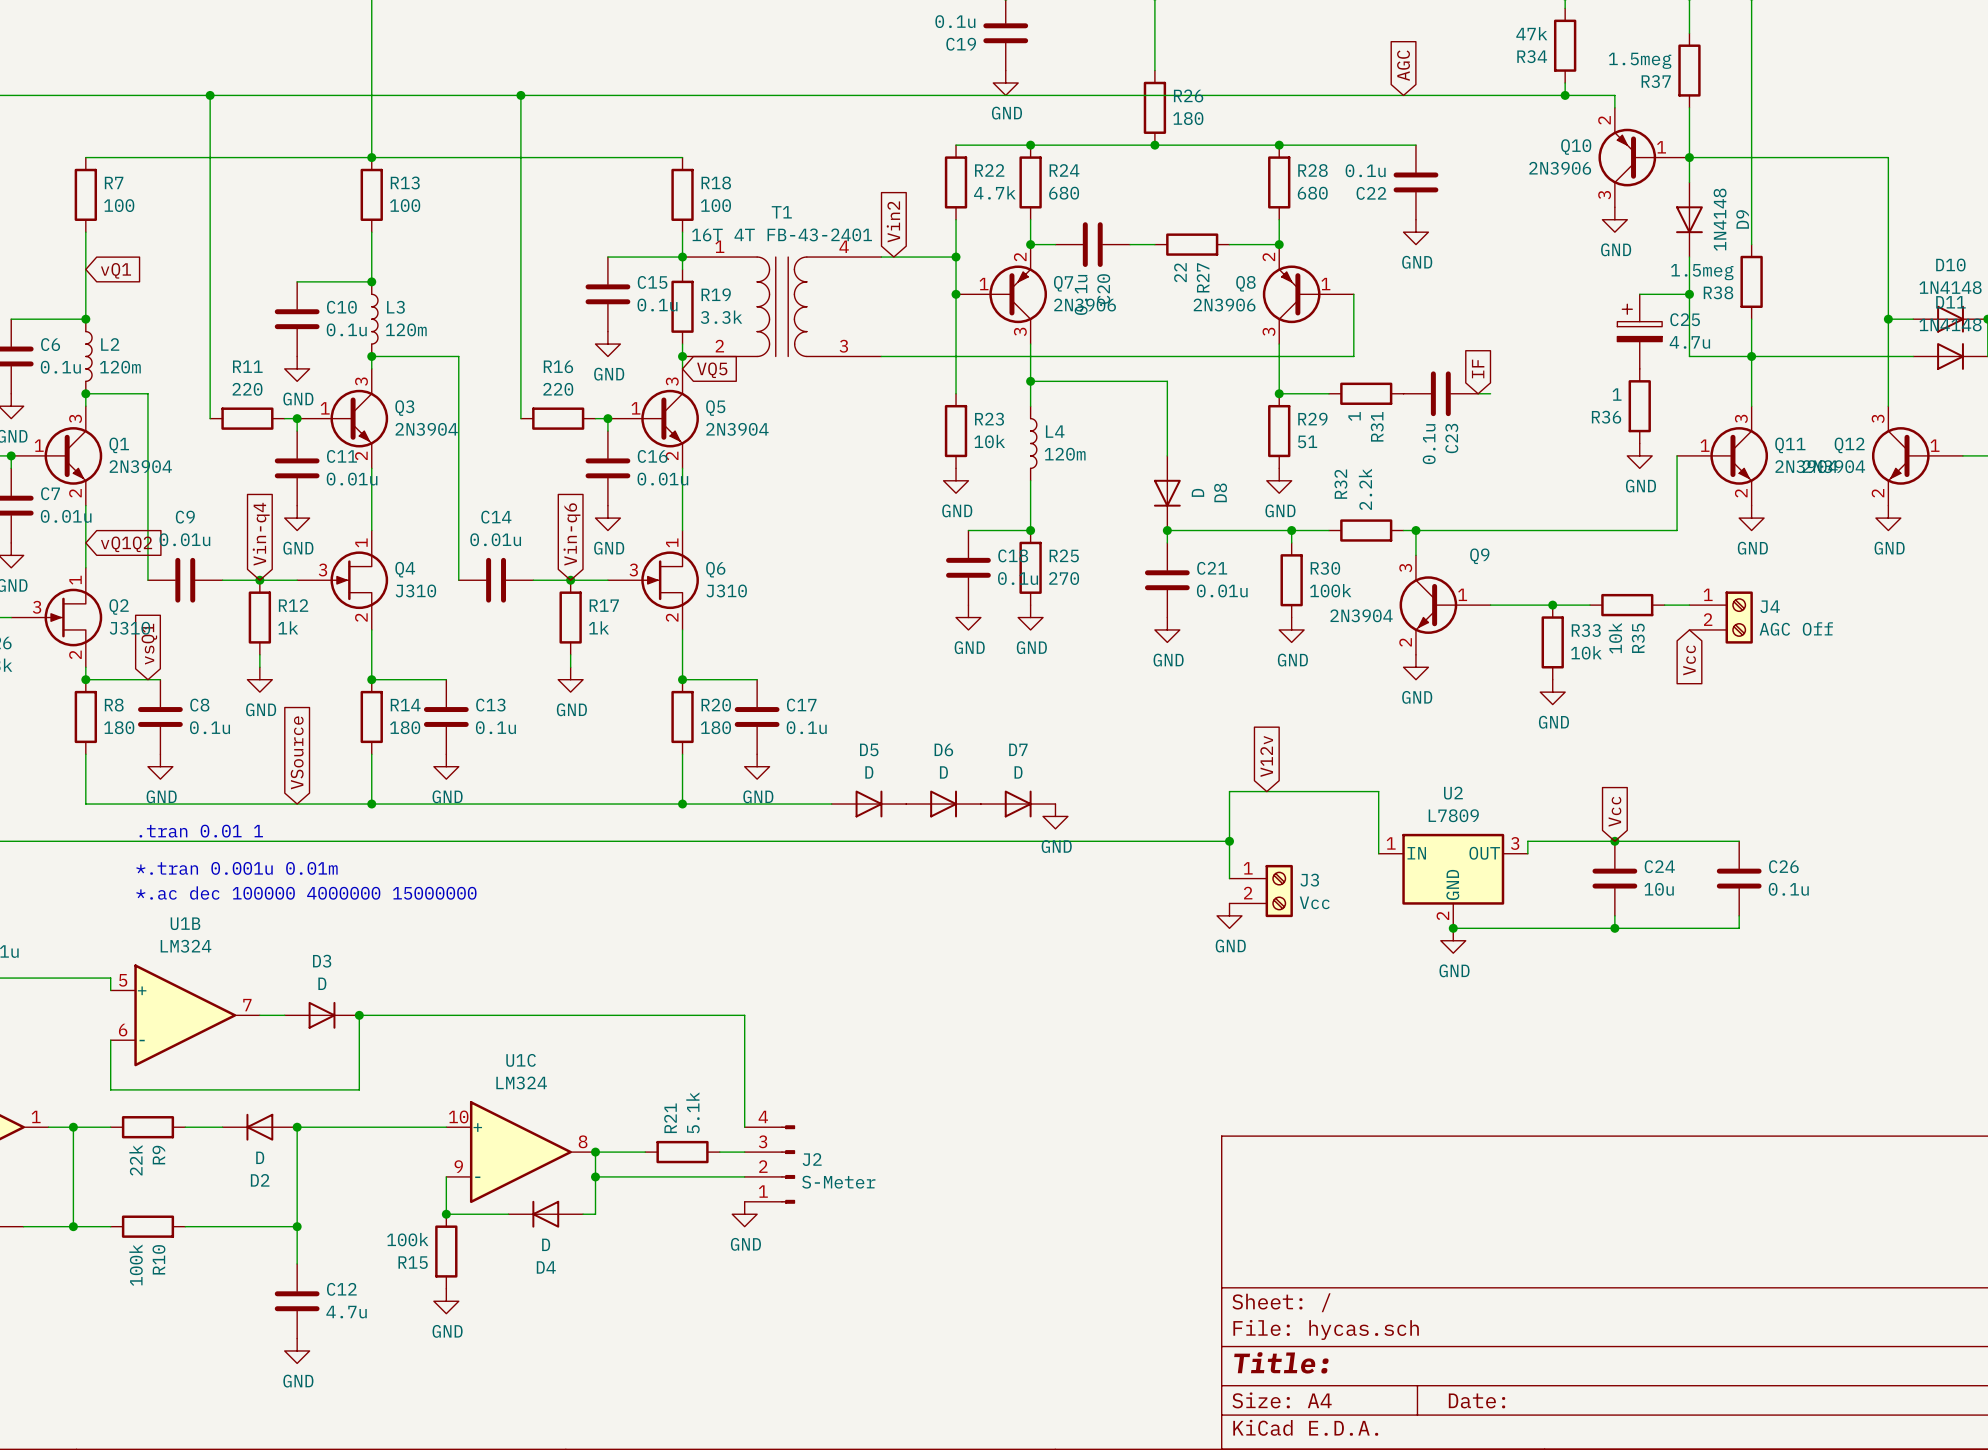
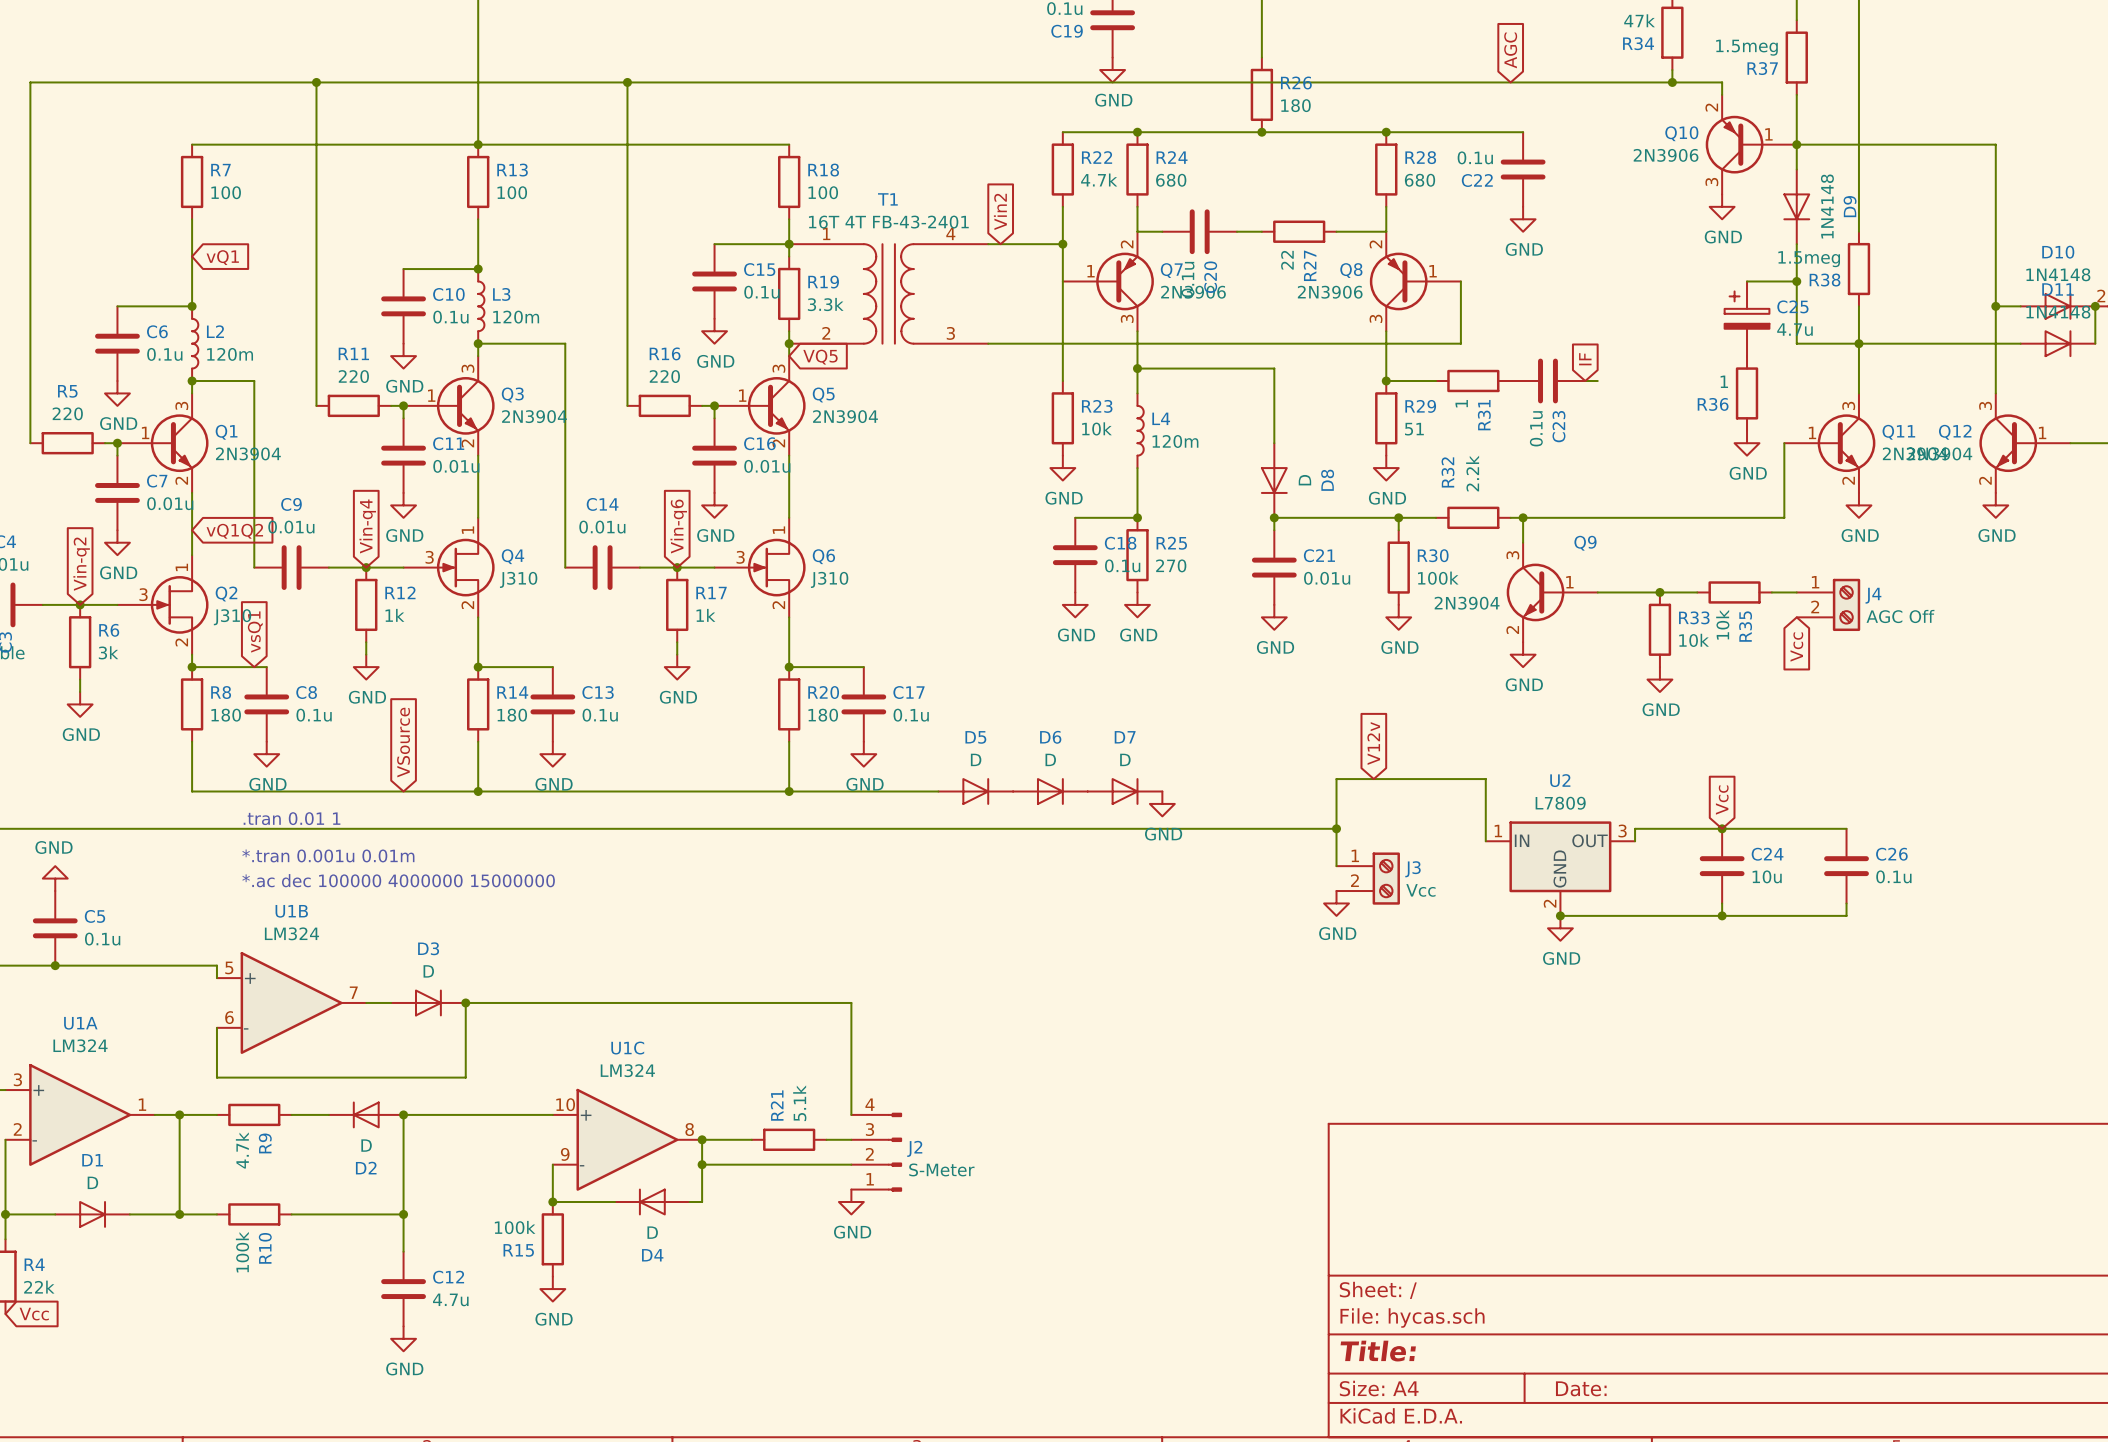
junction: (1030, 244) -> none
junction: (1279, 244) -> none
junction: (956, 294) -> none
R9 value: 22k (135, 1160) -> 4.7k (242, 1150)

